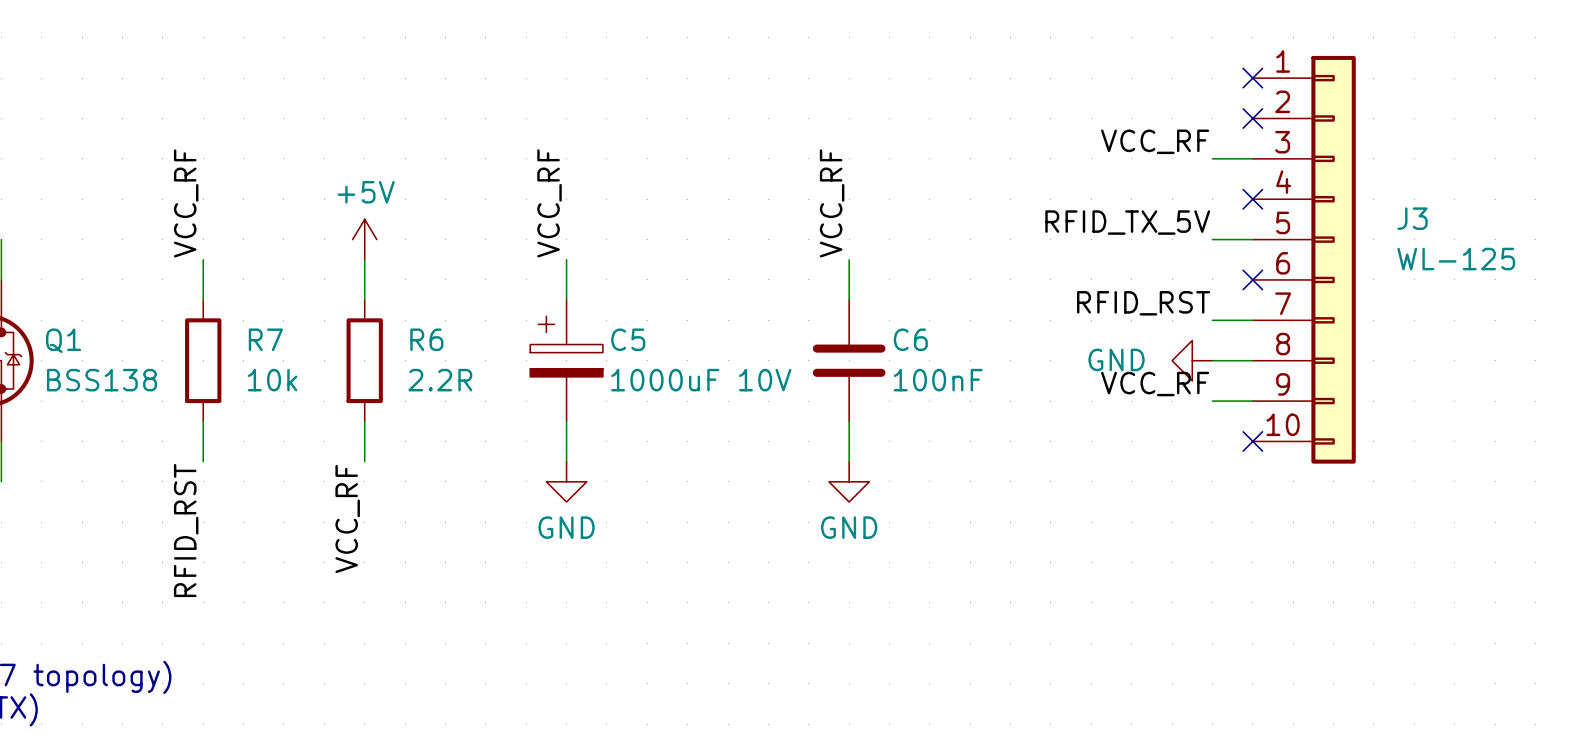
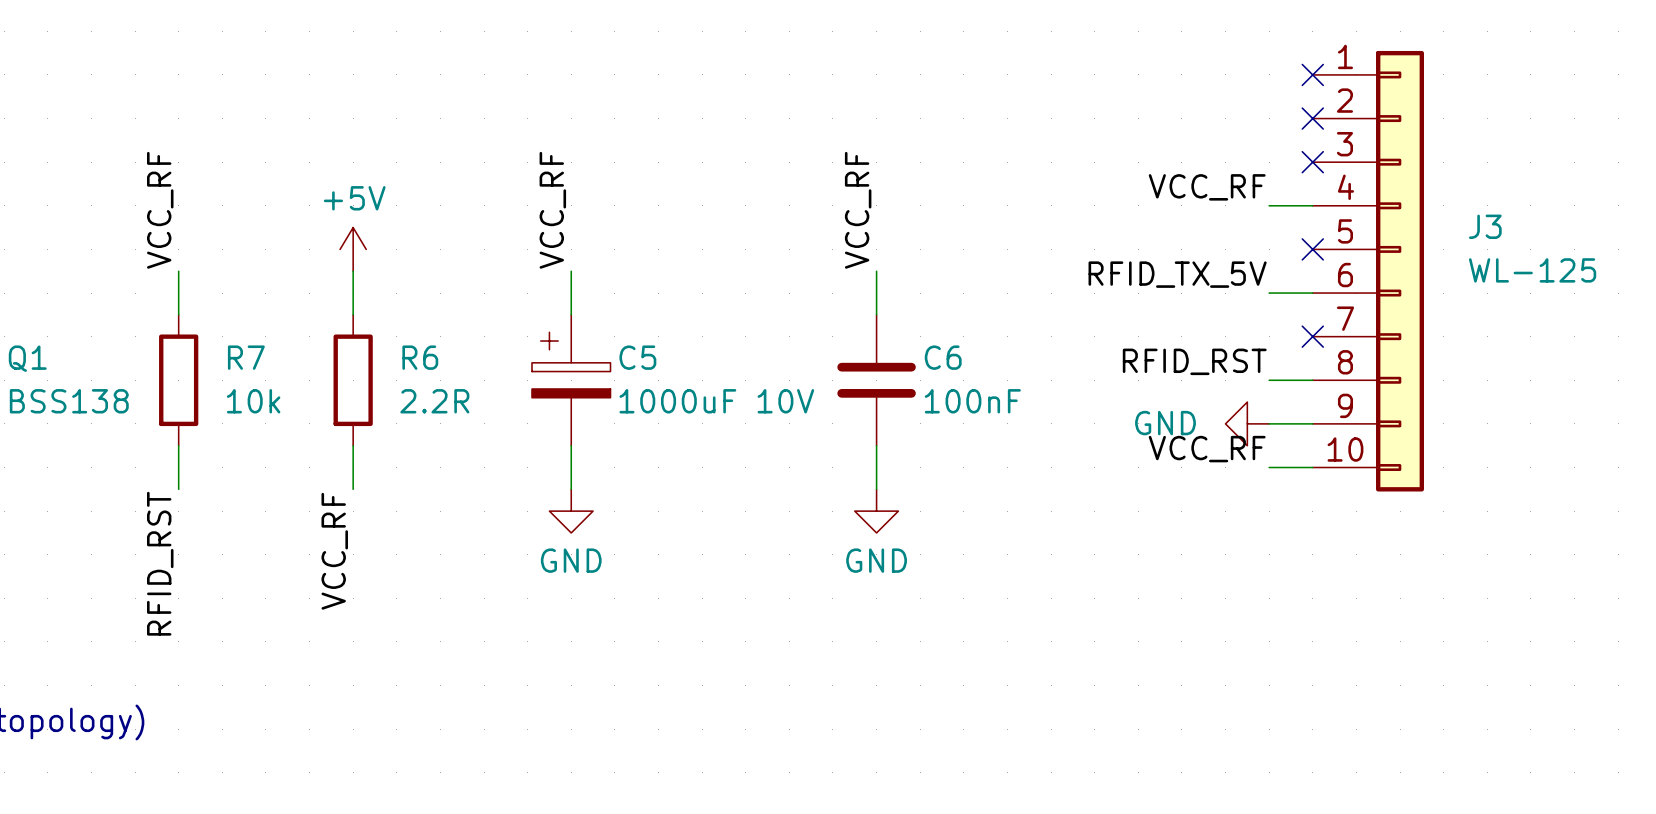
label position: VCC_RF (1155, 141) -> VCC_RF (1207, 187)
wire: (1212, 158) (1252, 158) -> (1269, 467) (1312, 467)
no-connect mark: none -> (1312, 162)
no-connect mark: (1252, 199) -> none
label position: RFID_TX_5V (1127, 222) -> RFID_TX_5V (1177, 274)
wire: (1212, 239) (1252, 239) -> (1269, 205) (1312, 205)
no-connect mark: none -> (1312, 249)
no-connect mark: (1252, 279) -> none
label position: RFID_RST (1143, 303) -> RFID_RST (1194, 361)
wire: (1212, 320) (1252, 320) -> (1269, 293) (1312, 293)
no-connect mark: none -> (1312, 336)
power symbol position: GND (1192, 360) -> GND (1247, 423)
label position: VCC_RF (1155, 384) -> VCC_RF (1207, 449)
no-connect mark: (1252, 441) -> none

